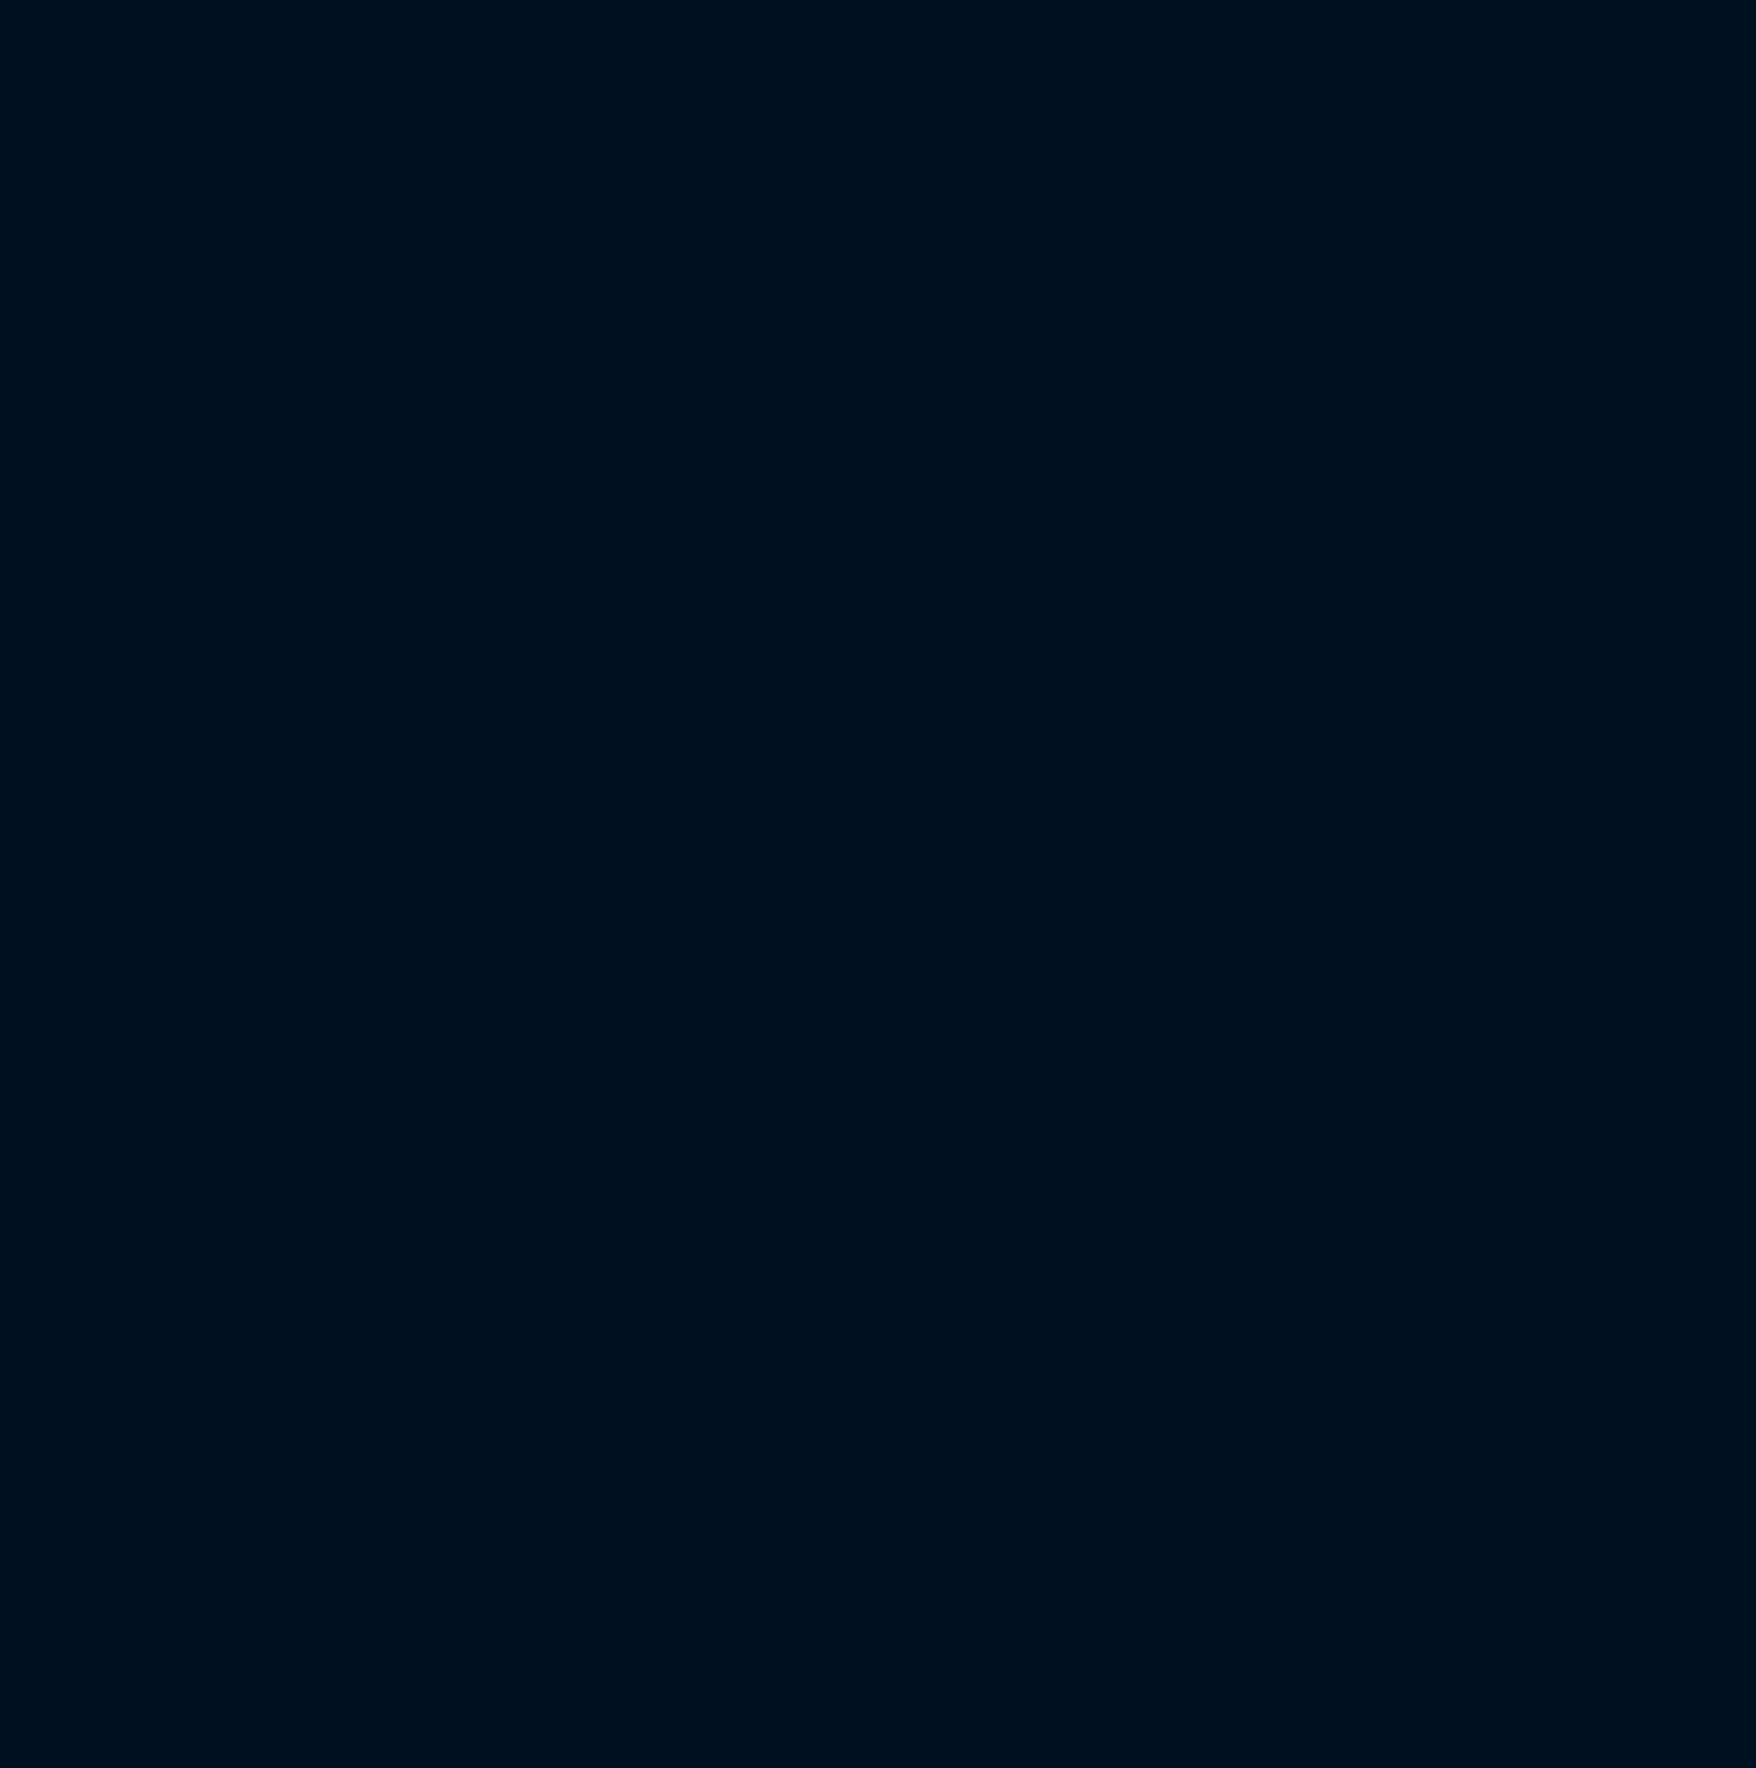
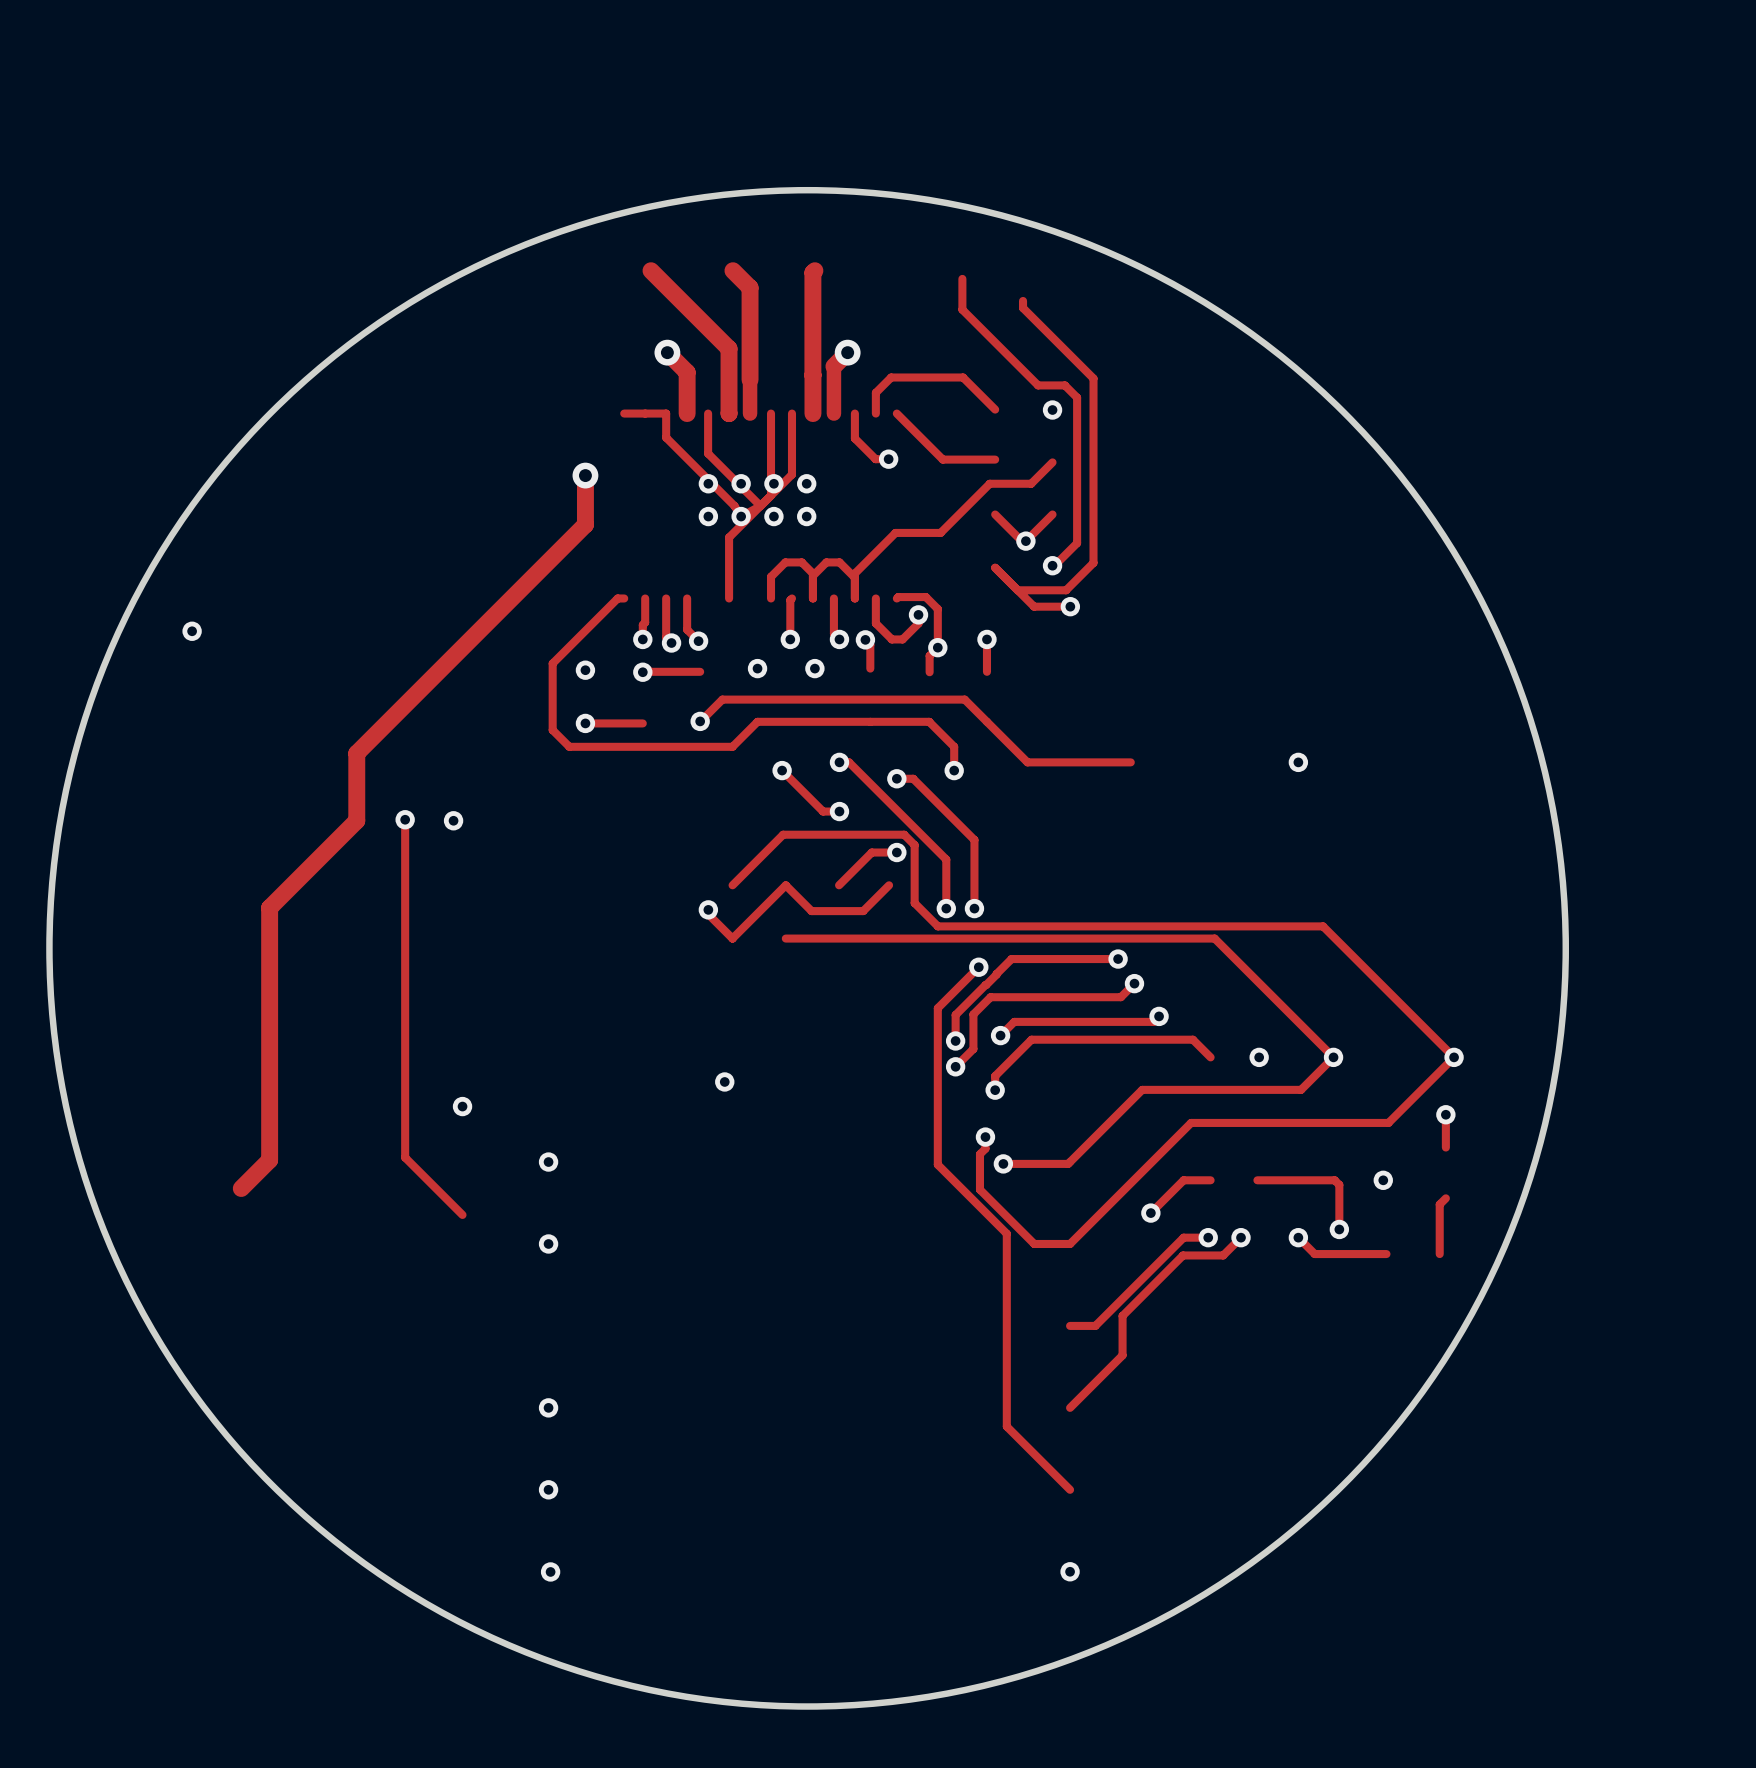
round board edge: none -> [46, 186, 1569, 1710]
track: none -> (651, 270) (729, 348) (729, 413)
track: none -> (732, 270) (750, 287) (750, 413)
track: none -> (814, 270) (812, 272) (812, 375)
track: none -> (962, 278) (962, 309) (1038, 385) (1064, 385) (1077, 397) (1077, 543) (1052, 567)
track: none -> (1023, 300) (1023, 308) (1093, 378) (1093, 562) (1066, 590) (1017, 590)
track: none -> (667, 352) (687, 372) (687, 413)
via: none -> (667, 352)
track: none -> (847, 352) (833, 366) (833, 413)
via: none -> (847, 352)
track: none -> (812, 375) (812, 413)
track: none -> (995, 409) (963, 377) (891, 377) (875, 392) (875, 413)
via: none -> (1052, 410)
track: none -> (624, 413) (666, 413) (666, 437) (708, 479) (708, 483) (712, 483) (734, 506) (741, 516) (760, 506) (741, 486) (741, 483) (738, 483) (708, 453) (708, 413)
track: none -> (771, 413) (771, 495)
track: none -> (791, 413) (791, 474) (729, 537) (729, 598)
track: none -> (854, 413) (854, 438) (875, 459) (888, 459)
track: none -> (896, 413) (942, 459) (995, 459)
via: none -> (888, 459)
track: none -> (1052, 462) (1031, 483) (989, 483) (940, 532) (895, 532) (854, 573) (854, 598)
track: none -> (585, 475) (585, 524) (356, 753) (356, 820) (269, 907) (269, 1160) (241, 1188)
via: none -> (585, 475)
via: none -> (708, 483)
via: none -> (741, 483)
via: none -> (773, 483)
via: none -> (806, 483)
track: none -> (995, 514) (1021, 541) (1025, 541) (1052, 514)
via: none -> (708, 516)
via: none -> (741, 516)
via: none -> (773, 516)
via: none -> (806, 516)
via: none -> (1025, 541)
via: none -> (1052, 565)
track: none -> (995, 567) (1034, 606) (1070, 606)
track: none -> (812, 575) (826, 562) (839, 562) (854, 577)
track: none -> (624, 598) (617, 598) (552, 663) (552, 730) (569, 746) (732, 746) (757, 721) (929, 721) (954, 746) (954, 770)
track: none -> (645, 598) (642, 639)
track: none -> (666, 598) (666, 637) (671, 643)
track: none -> (687, 598) (687, 629) (698, 641)
track: none -> (771, 598) (771, 576) (785, 562) (801, 562) (812, 573) (812, 598)
track: none -> (791, 598) (790, 600) (790, 639)
track: none -> (833, 598) (833, 633) (839, 639)
track: none -> (875, 598) (875, 623) (891, 639) (902, 639) (918, 623) (918, 614)
track: none -> (896, 598) (925, 597) (937, 609) (937, 647) (929, 655) (929, 672)
via: none -> (1070, 606)
via: none -> (918, 614)
via: none -> (192, 631)
via: none -> (642, 639)
via: none -> (790, 639)
via: none -> (839, 639)
track: none -> (865, 639) (870, 644) (870, 668)
via: none -> (865, 639)
track: none -> (986, 639) (986, 671)
via: none -> (986, 639)
via: none -> (698, 641)
via: none -> (671, 643)
via: none -> (937, 647)
via: none -> (757, 668)
via: none -> (814, 668)
via: none -> (585, 670)
track: none -> (643, 671) (700, 671)
via: none -> (642, 672)
track: none -> (700, 721) (722, 699) (964, 699) (1027, 762) (1130, 762)
via: none -> (700, 721)
track: none -> (585, 723) (642, 723)
via: none -> (585, 723)
track: none -> (839, 762) (849, 762) (946, 859) (946, 908)
via: none -> (839, 762)
via: none -> (1298, 762)
track: none -> (782, 770) (823, 811) (839, 811)
via: none -> (782, 770)
via: none -> (954, 770)
track: none -> (896, 778) (913, 778) (974, 839) (974, 908)
via: none -> (896, 778)
via: none -> (839, 811)
via: none -> (405, 819)
track: none -> (405, 820) (405, 1157) (462, 1214)
via: none -> (453, 820)
track: none -> (896, 852) (871, 852) (839, 885)
via: none -> (896, 852)
track: none -> (732, 885) (783, 834) (904, 834) (914, 845) (914, 903) (937, 926) (1323, 926) (1454, 1057) (1388, 1122) (1191, 1122) (1070, 1243) (1034, 1243) (979, 1189) (979, 1154) (985, 1148) (985, 1137)
track: none -> (889, 885) (863, 911) (811, 911) (785, 885) (732, 938) (708, 914) (708, 909)
via: none -> (946, 908)
via: none -> (974, 908)
via: none -> (708, 909)
track: none -> (785, 938) (1214, 938) (1333, 1057) (1301, 1089) (1142, 1089) (1068, 1163) (1003, 1163)
track: none -> (1118, 959) (1011, 959) (996, 974)
via: none -> (1118, 959)
track: none -> (978, 967) (937, 1008) (937, 1164) (1006, 1233) (1006, 1426) (1070, 1489)
via: none -> (978, 967)
track: none -> (996, 974) (986, 985)
track: none -> (1134, 983) (1120, 997) (990, 997) (973, 1014) (973, 1048) (955, 1066)
via: none -> (1134, 983)
track: none -> (985, 985) (955, 1014) (955, 1040)
track: none -> (1159, 1016) (1153, 1021) (1014, 1021) (1000, 1035)
via: none -> (1159, 1016)
via: none -> (1000, 1035)
via: none -> (955, 1040)
track: none -> (1210, 1057) (1192, 1039) (1031, 1039) (995, 1076) (995, 1090)
via: none -> (1259, 1057)
via: none -> (1333, 1057)
via: none -> (1454, 1057)
via: none -> (955, 1066)
via: none -> (724, 1081)
via: none -> (995, 1090)
via: none -> (462, 1106)
track: none -> (1445, 1114) (1445, 1147)
via: none -> (1445, 1114)
via: none -> (985, 1137)
via: none -> (548, 1162)
via: none -> (1003, 1163)
track: none -> (1210, 1180) (1183, 1180) (1150, 1213)
track: none -> (1257, 1180) (1334, 1180) (1339, 1184) (1339, 1229)
via: none -> (1383, 1180)
track: none -> (1445, 1198) (1439, 1204) (1439, 1254)
via: none -> (1150, 1213)
via: none -> (1339, 1229)
track: none -> (1208, 1237) (1183, 1237) (1095, 1325) (1070, 1325)
via: none -> (1208, 1237)
track: none -> (1241, 1237) (1223, 1255) (1183, 1255) (1122, 1315) (1122, 1355) (1070, 1407)
via: none -> (1241, 1237)
track: none -> (1298, 1237) (1314, 1254) (1386, 1254)
via: none -> (1298, 1237)
via: none -> (548, 1243)
via: none -> (548, 1407)
via: none -> (548, 1489)
via: none -> (550, 1571)
via: none -> (1070, 1571)

